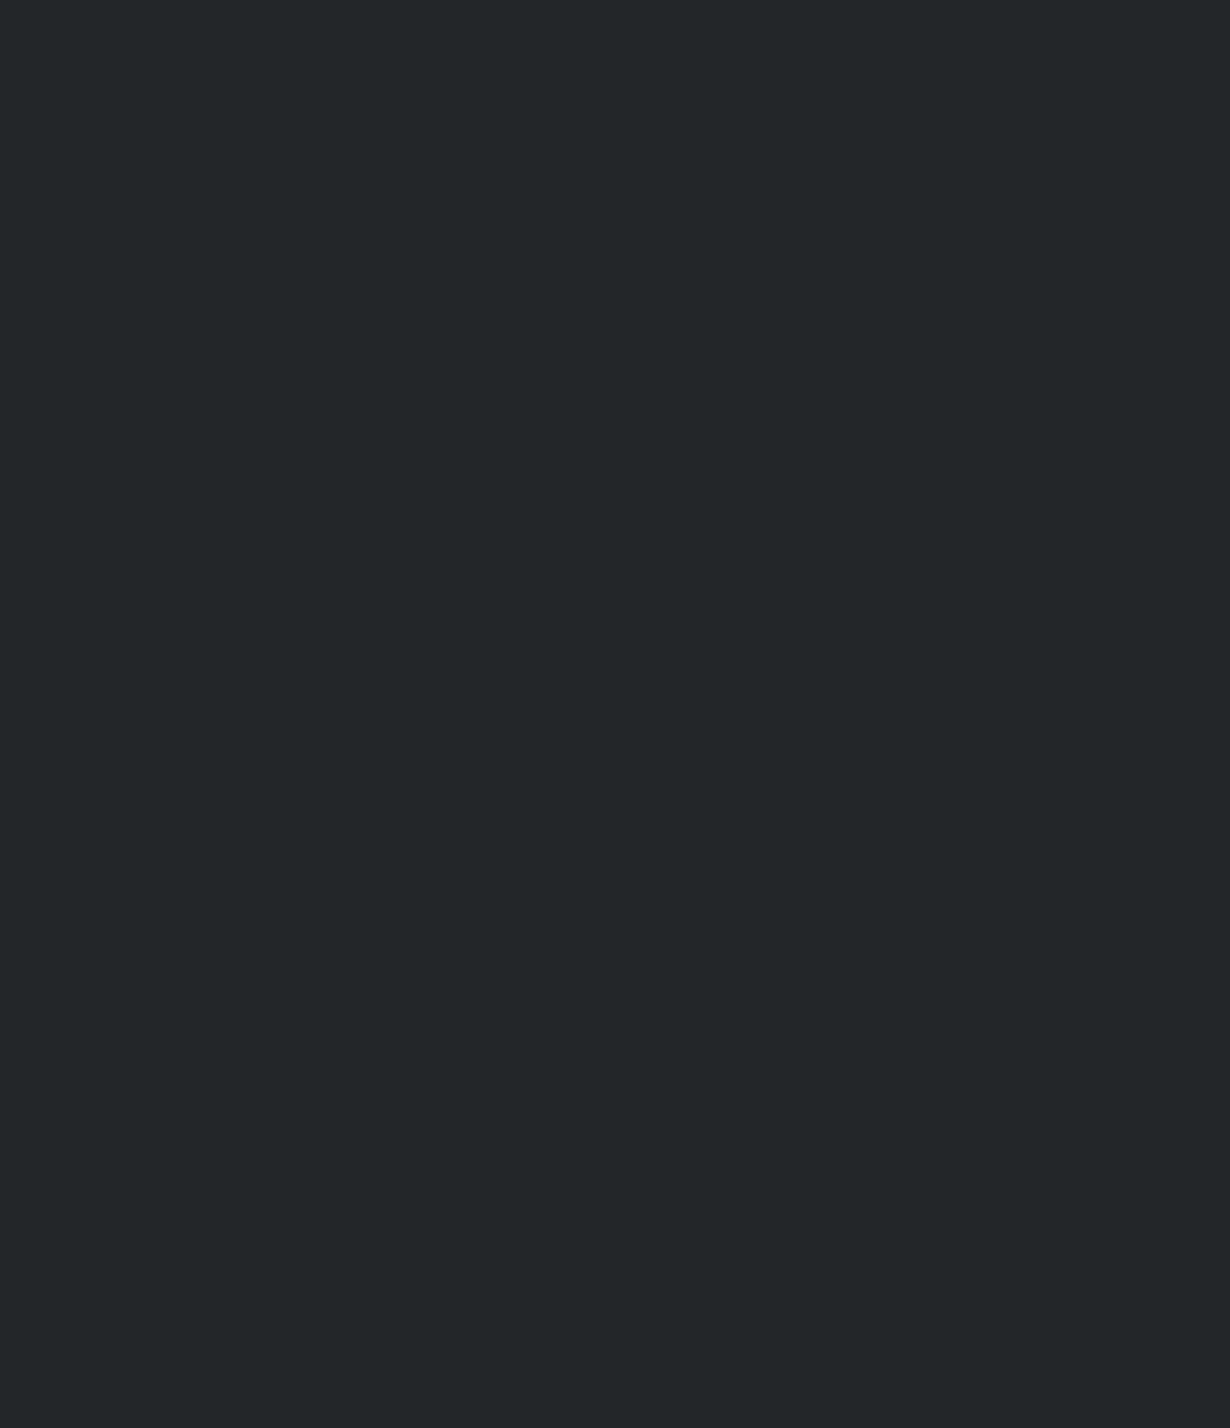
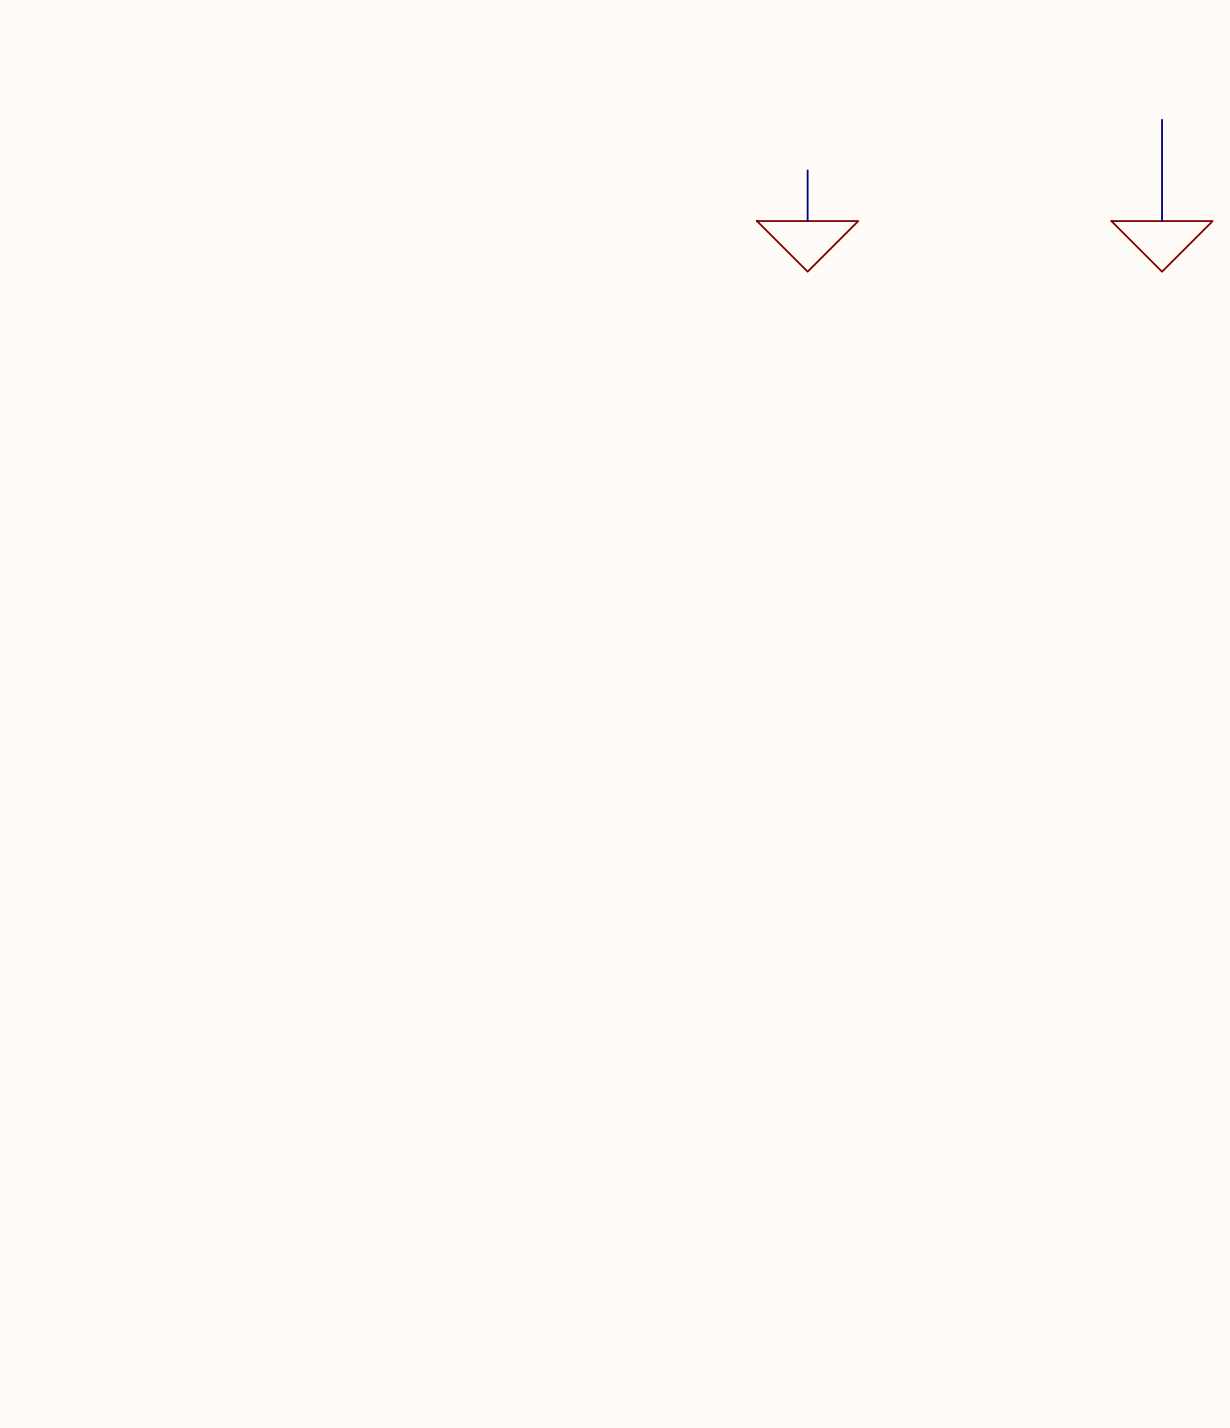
wire: none -> (1162, 119) (1162, 221)
wire: none -> (807, 170) (807, 221)
power symbol: none -> (807, 246)
power symbol: none -> (1162, 246)

